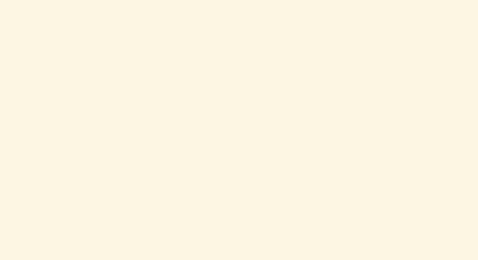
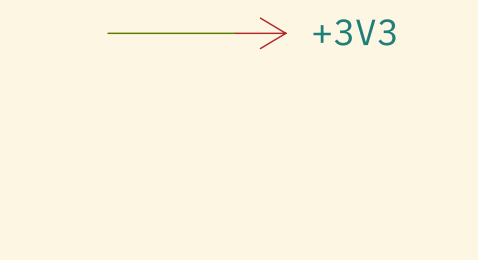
wire: none -> (108, 33) (235, 33)
power symbol: none -> +3V3 (260, 33)

